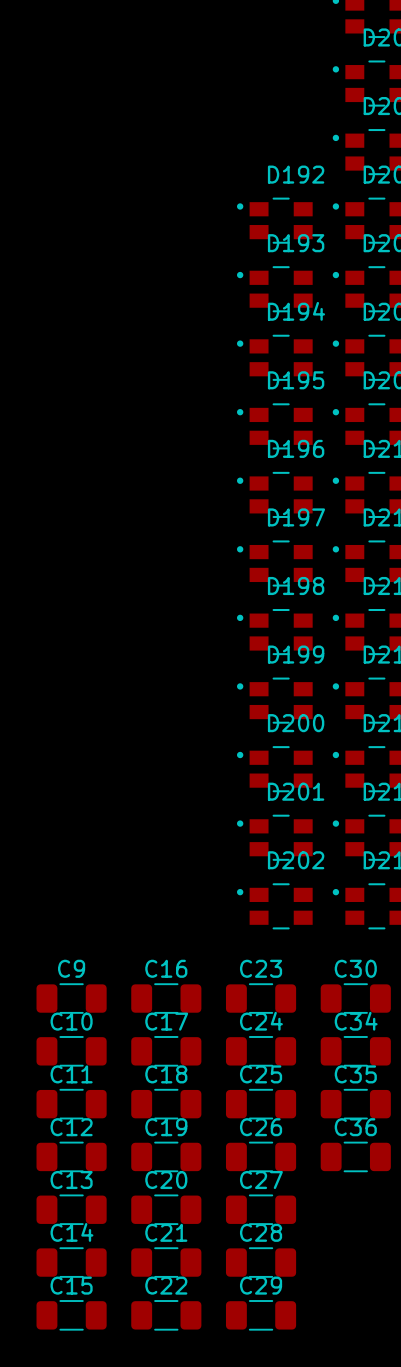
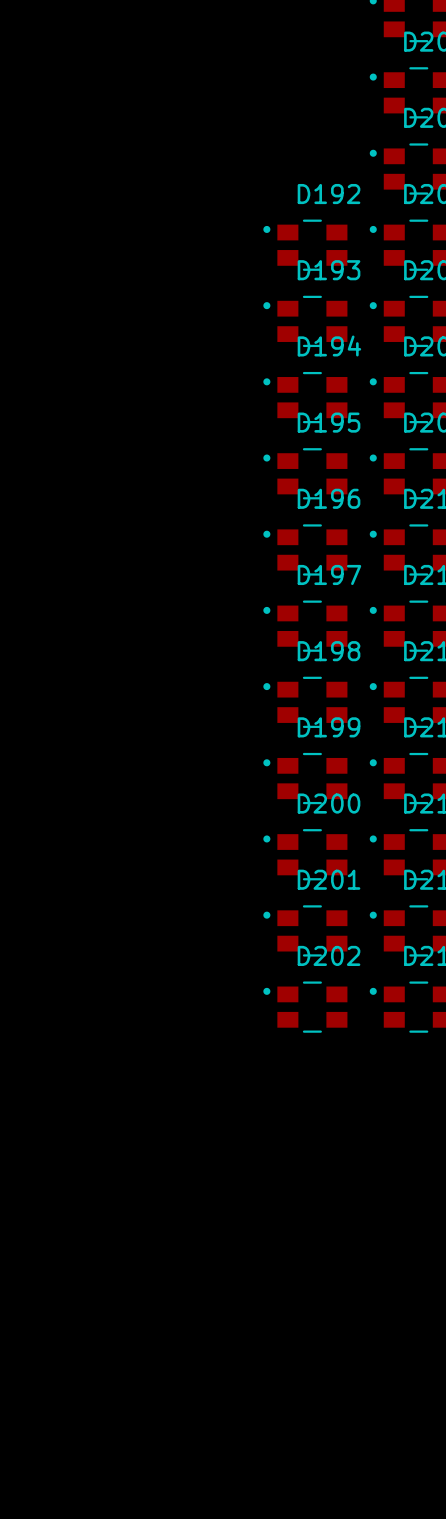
C9: (71, 998) -> none
C16: (166, 998) -> none
C23: (261, 998) -> none
C30: (355, 998) -> none
C10: (71, 1051) -> none
C17: (166, 1051) -> none
C24: (261, 1051) -> none
C34: (355, 1051) -> none
C11: (71, 1104) -> none
C18: (166, 1104) -> none
C25: (261, 1104) -> none
C35: (355, 1104) -> none
C12: (71, 1156) -> none
C19: (166, 1156) -> none
C26: (261, 1156) -> none
C36: (355, 1156) -> none
C13: (71, 1209) -> none
C20: (166, 1209) -> none
C27: (261, 1209) -> none
C14: (71, 1262) -> none
C21: (166, 1262) -> none
C28: (261, 1262) -> none
C15: (71, 1315) -> none
C22: (166, 1315) -> none
C29: (261, 1315) -> none

